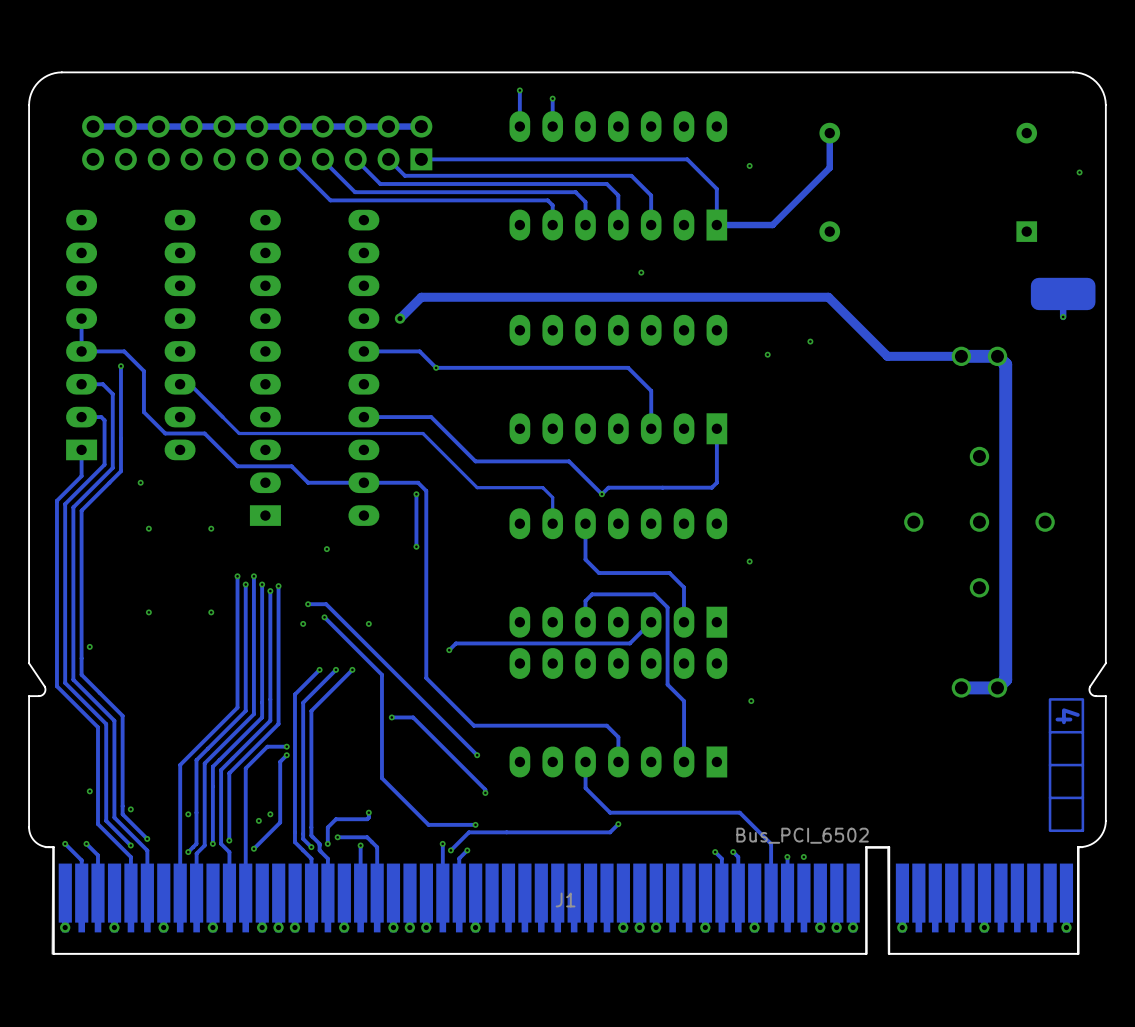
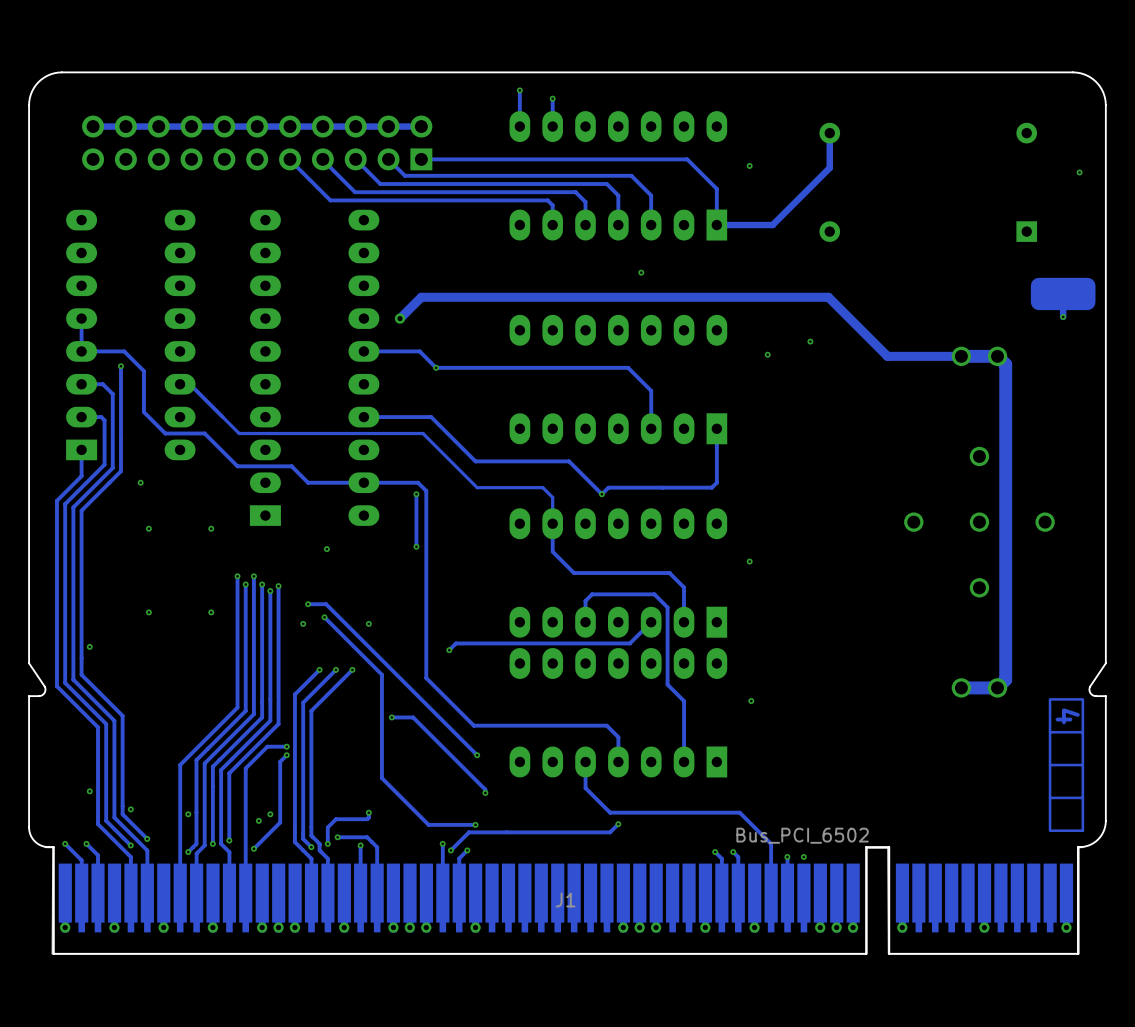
track: (585, 523) (585, 559) (598, 573) -> (552, 523) (552, 551) (574, 573) (598, 573)

